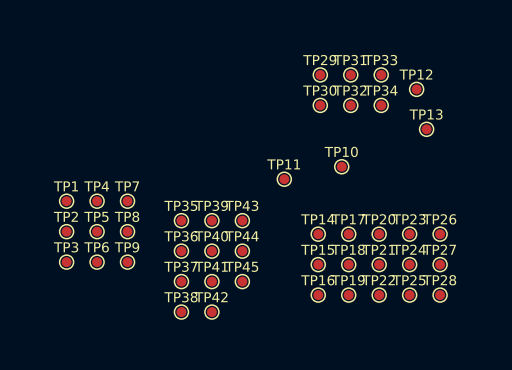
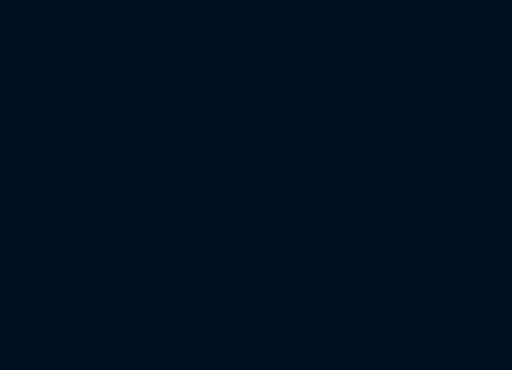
TP29: (320, 74) -> none
TP31: (350, 74) -> none
TP33: (381, 74) -> none
TP12: (416, 89) -> none
TP30: (320, 105) -> none
TP32: (350, 105) -> none
TP34: (381, 105) -> none
TP13: (426, 129) -> none
TP10: (341, 166) -> none
TP11: (284, 179) -> none
TP1: (66, 201) -> none
TP4: (97, 201) -> none
TP7: (127, 201) -> none
TP35: (181, 220) -> none
TP39: (211, 220) -> none
TP43: (242, 220) -> none
TP2: (66, 231) -> none
TP5: (97, 231) -> none
TP8: (127, 231) -> none
TP14: (318, 234) -> none
TP17: (348, 234) -> none
TP20: (379, 234) -> none
TP23: (409, 234) -> none
TP26: (440, 234) -> none
TP36: (181, 251) -> none
TP40: (211, 251) -> none
TP44: (242, 251) -> none
TP3: (66, 262) -> none
TP6: (97, 262) -> none
TP9: (127, 262) -> none
TP15: (318, 264) -> none
TP18: (348, 264) -> none
TP21: (379, 264) -> none
TP24: (409, 264) -> none
TP27: (440, 264) -> none
TP37: (181, 281) -> none
TP41: (211, 281) -> none
TP45: (242, 281) -> none
TP16: (318, 295) -> none
TP19: (348, 295) -> none
TP22: (379, 295) -> none
TP25: (409, 295) -> none
TP28: (440, 295) -> none
TP38: (181, 312) -> none
TP42: (211, 312) -> none

